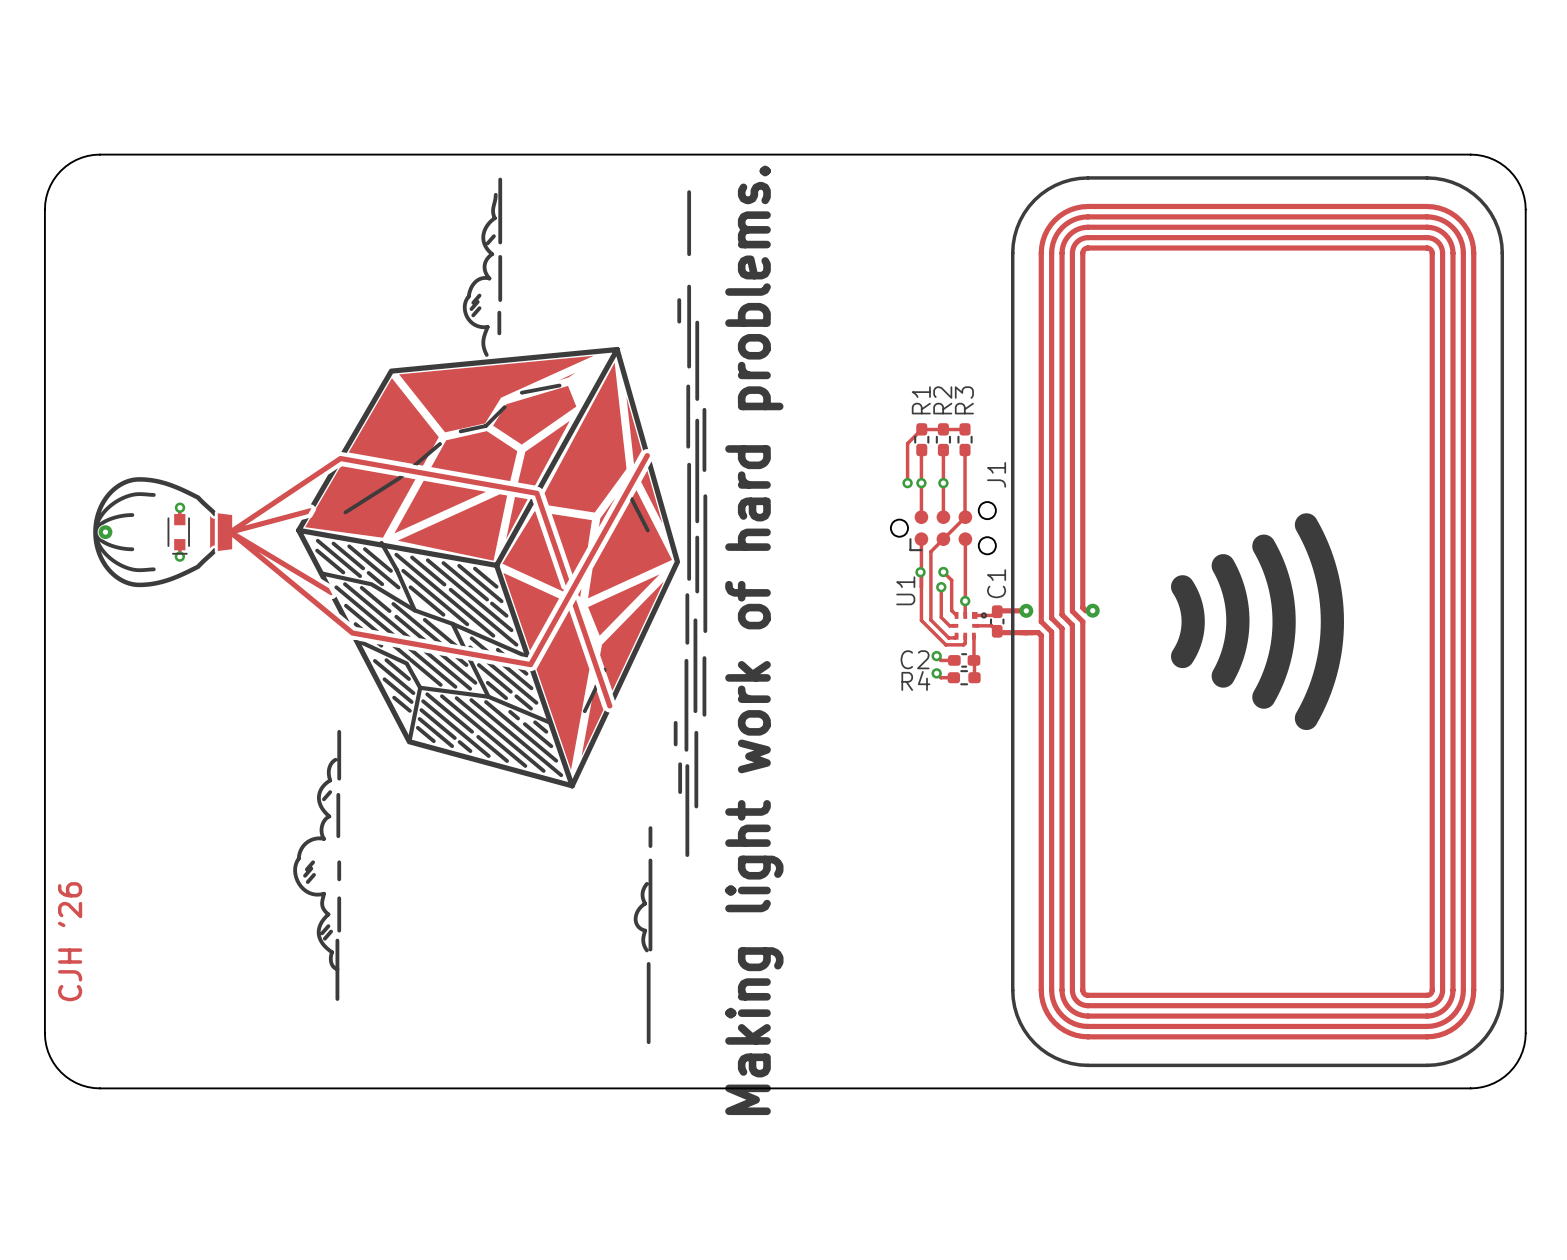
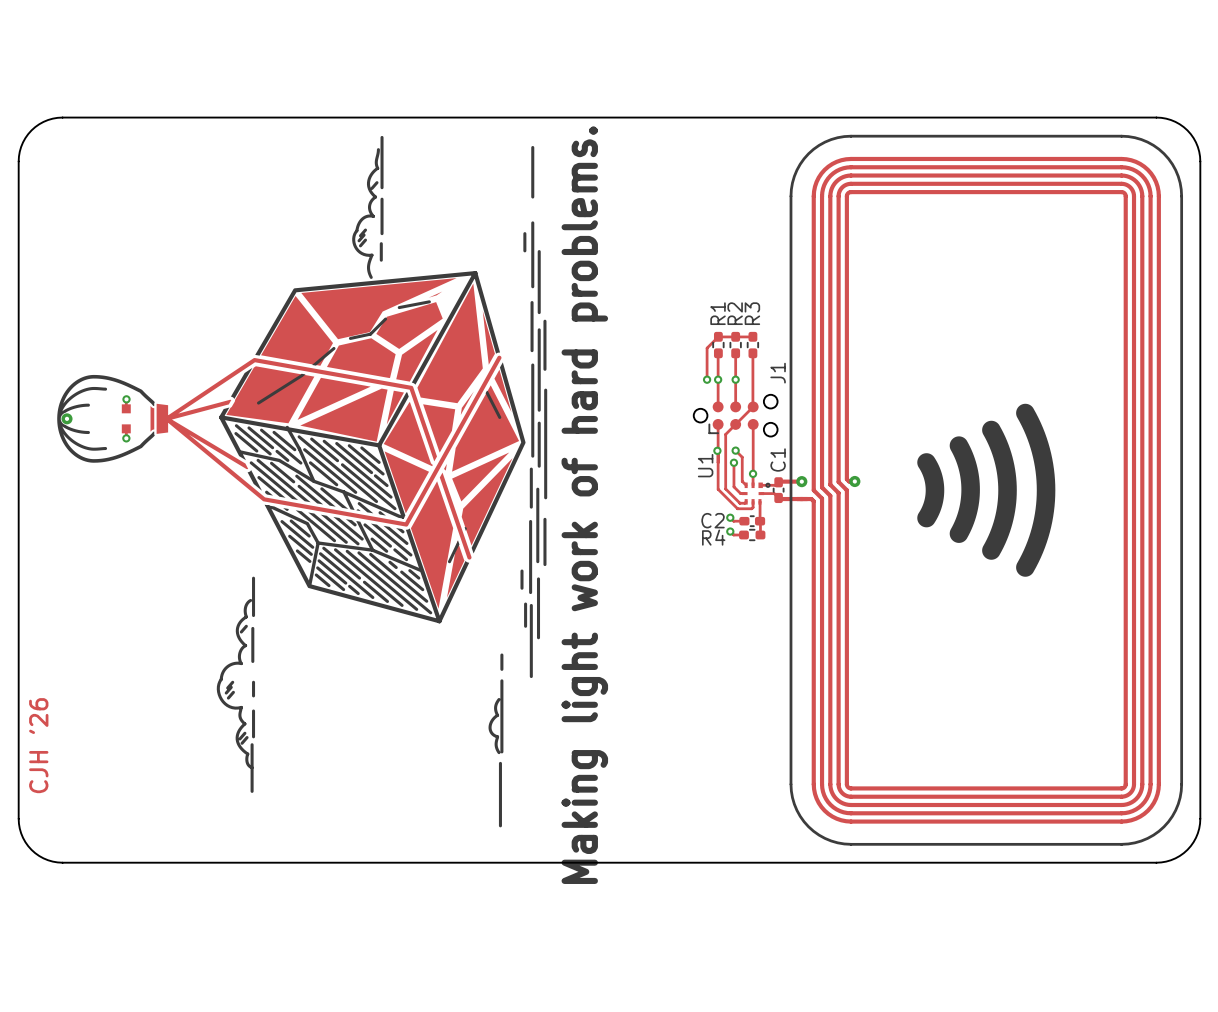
part footprint: [167, 513, 190, 555] -> [121, 404, 131, 434]

